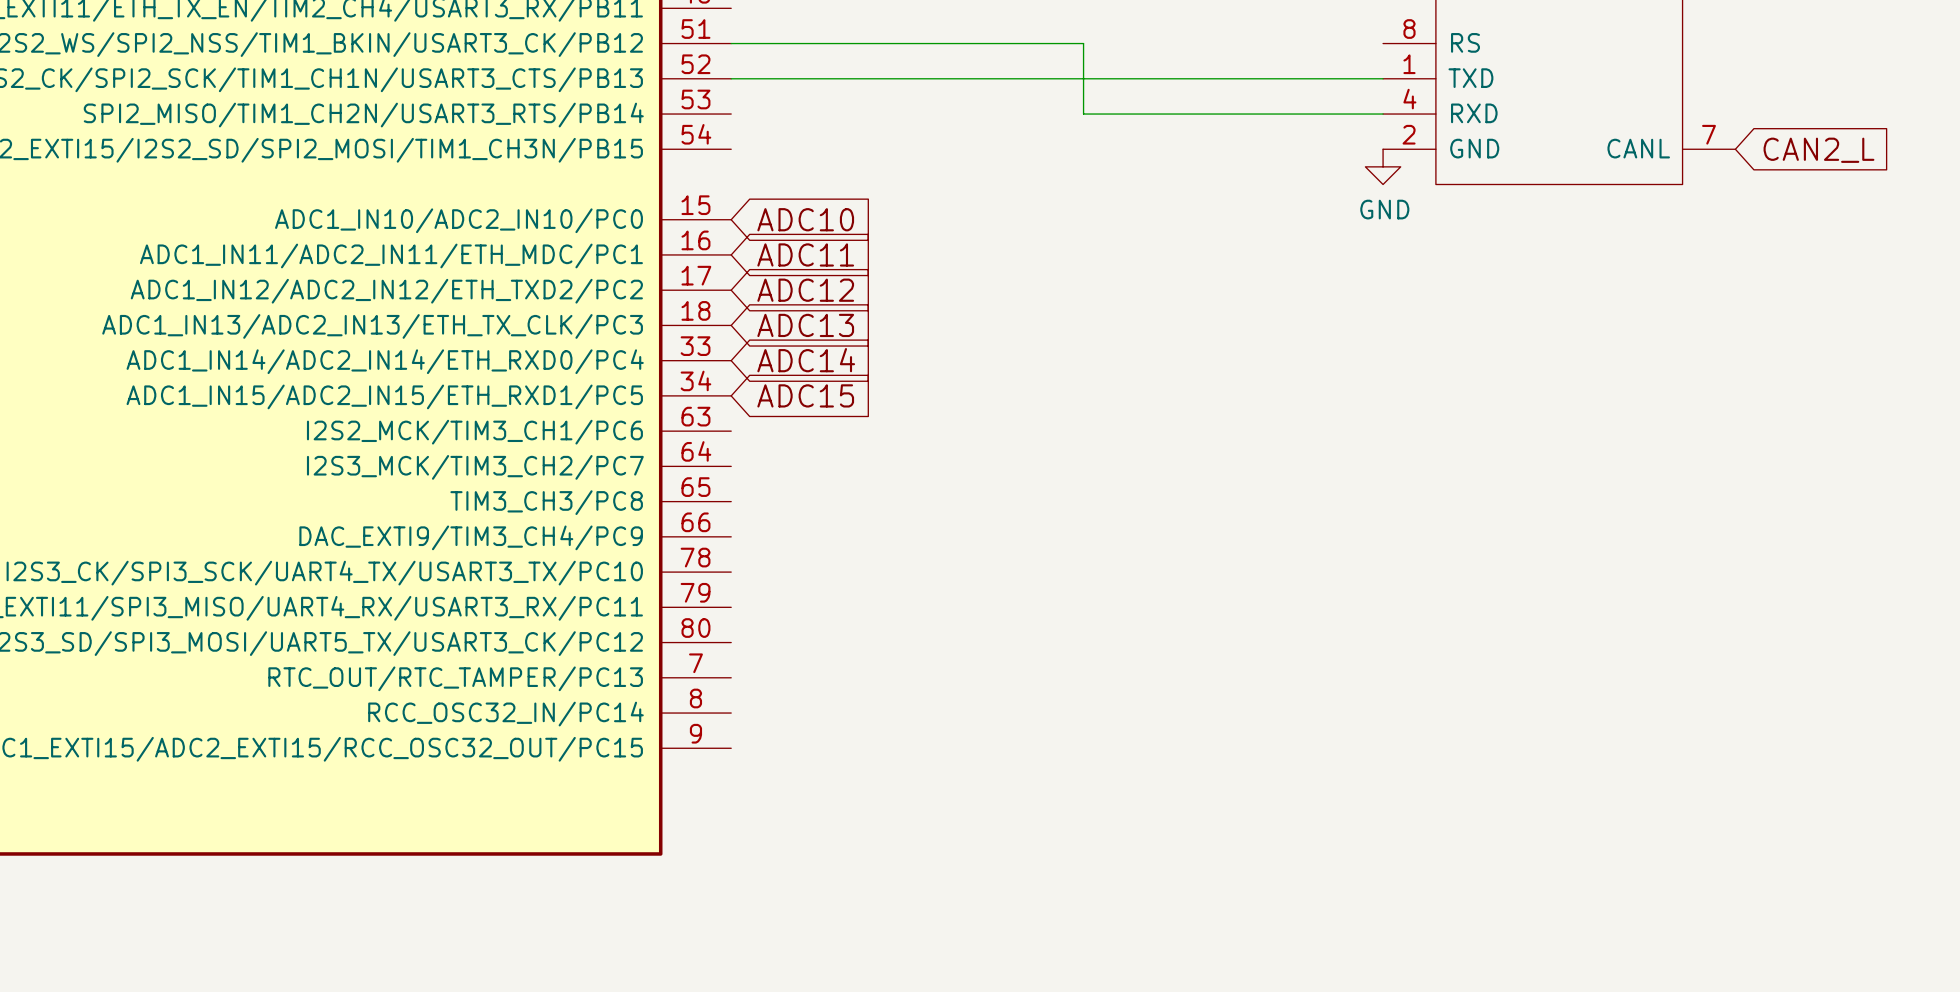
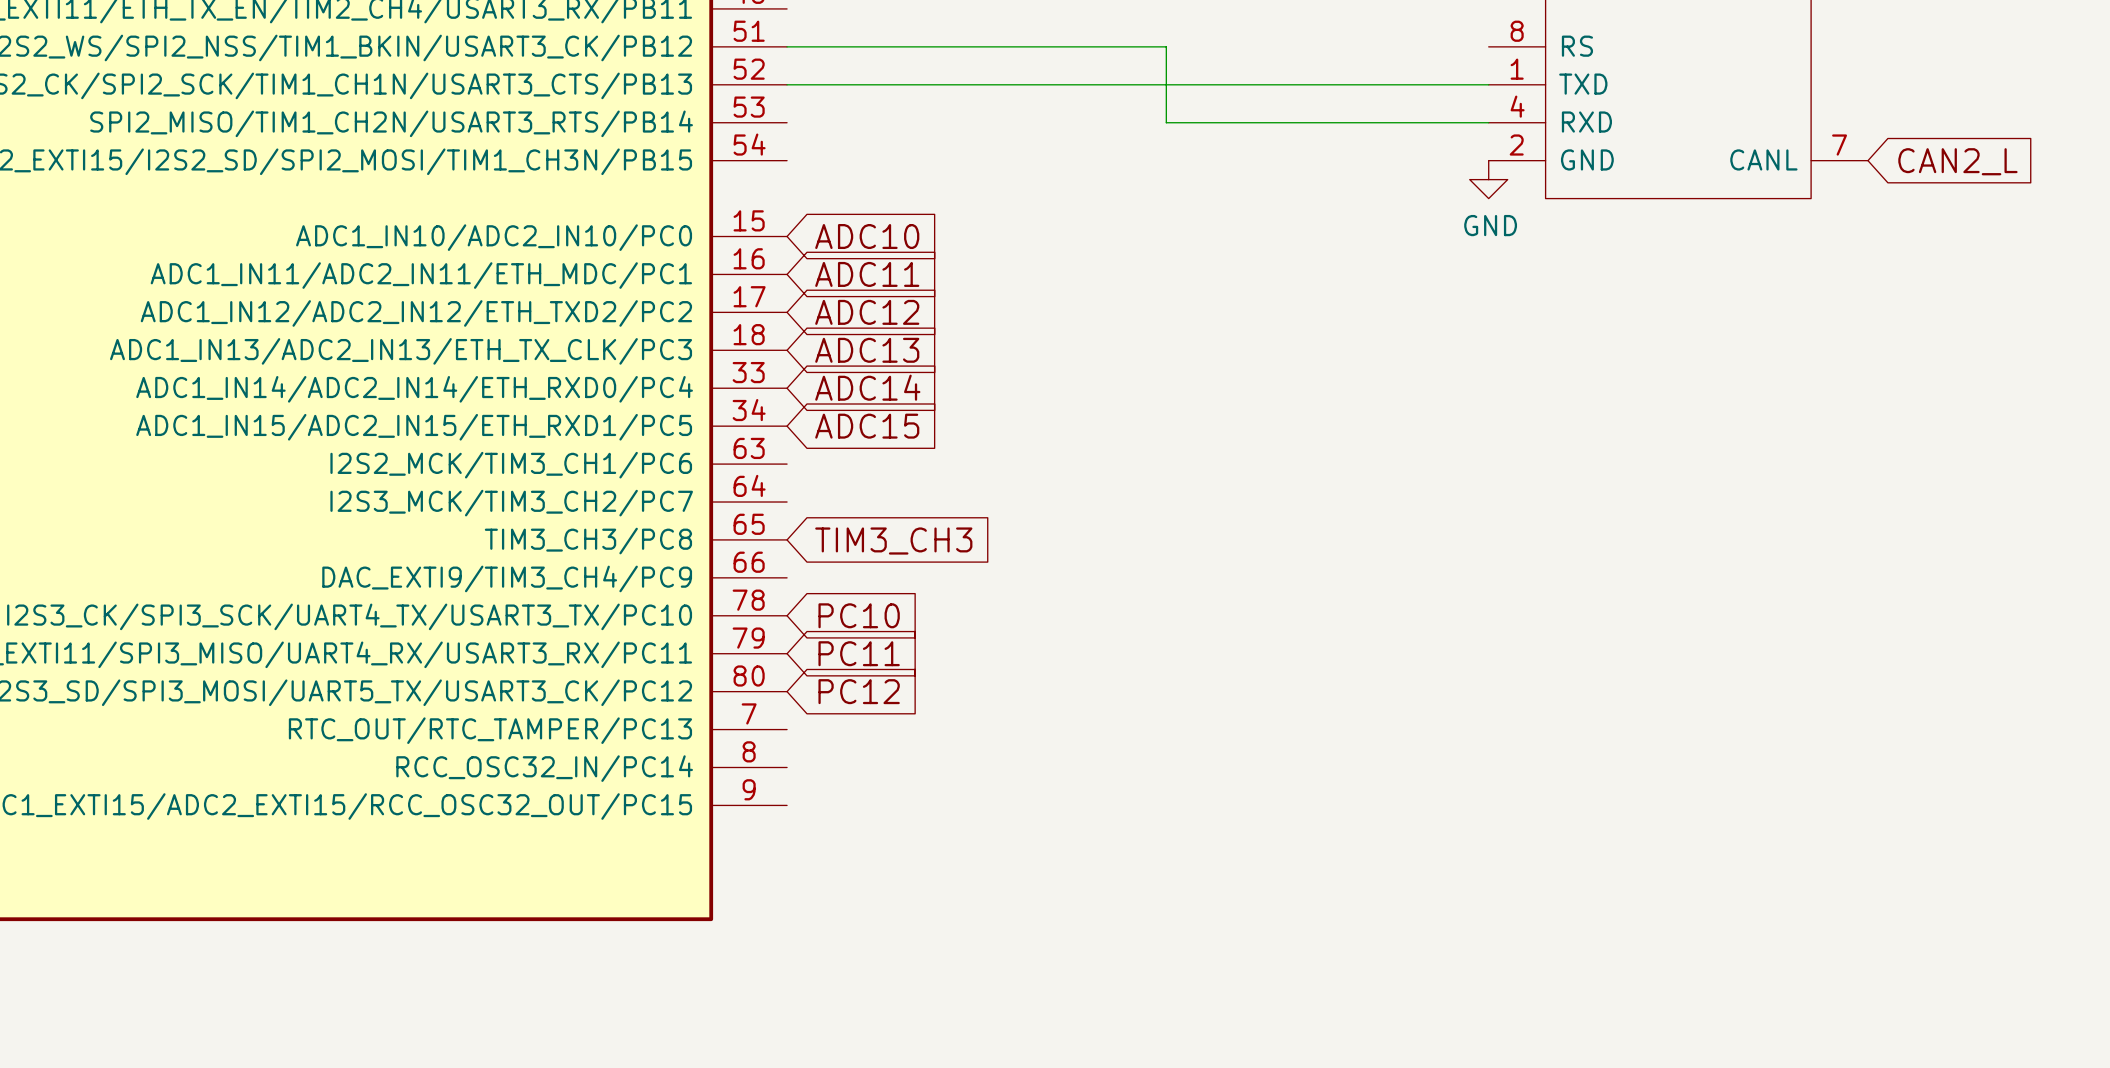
global label: none -> TIM3_CH3 (893, 541)
global label: none -> PC10 (859, 615)
global label: none -> PC11 (859, 653)
global label: none -> PC12 (859, 691)

